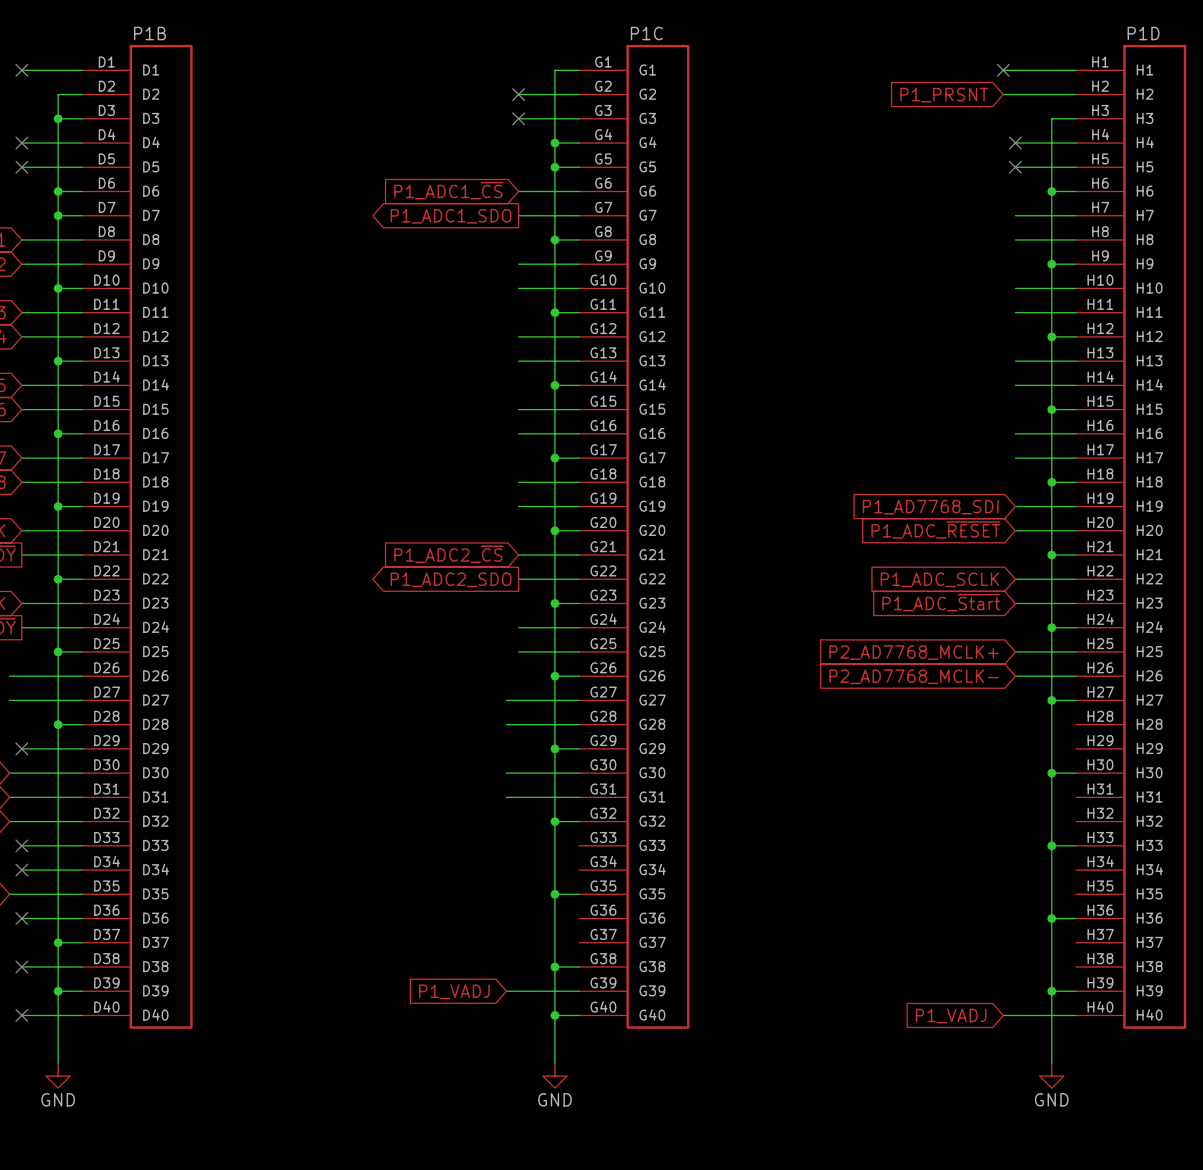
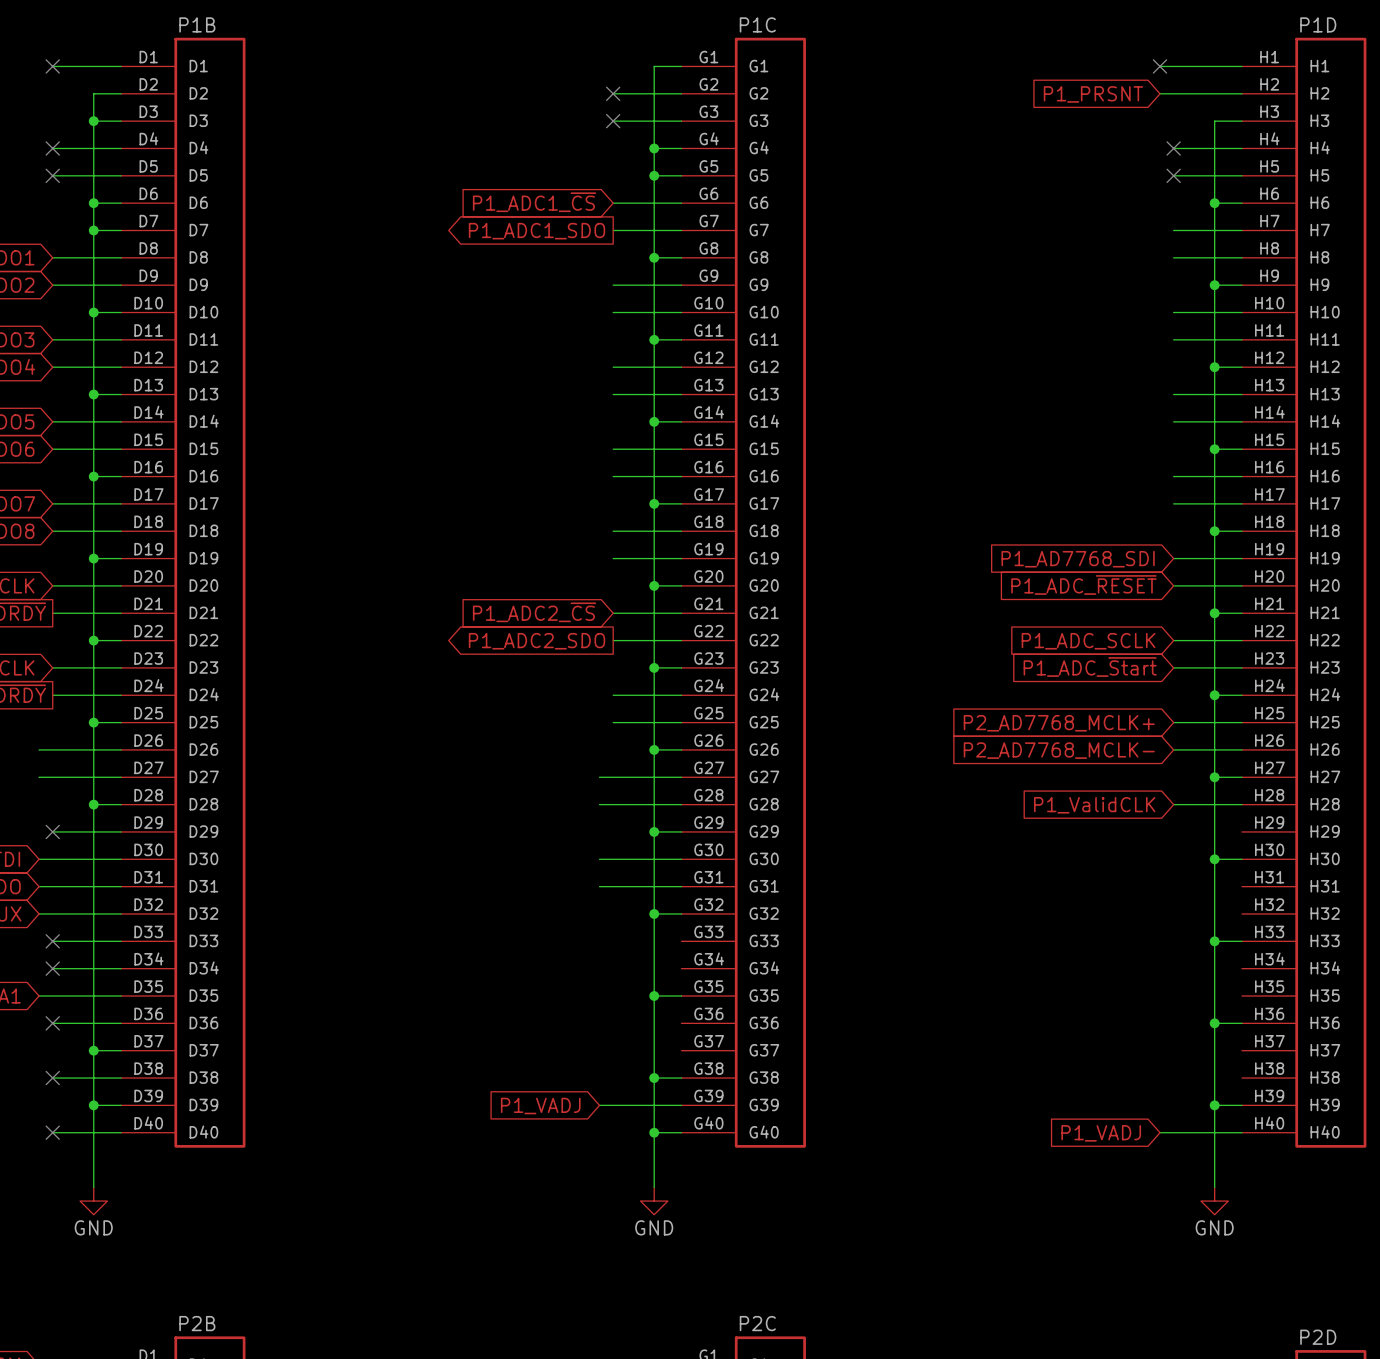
wire: none -> (1173, 804) (1242, 804)
global label: none -> P1_ValidCLK (1094, 805)

